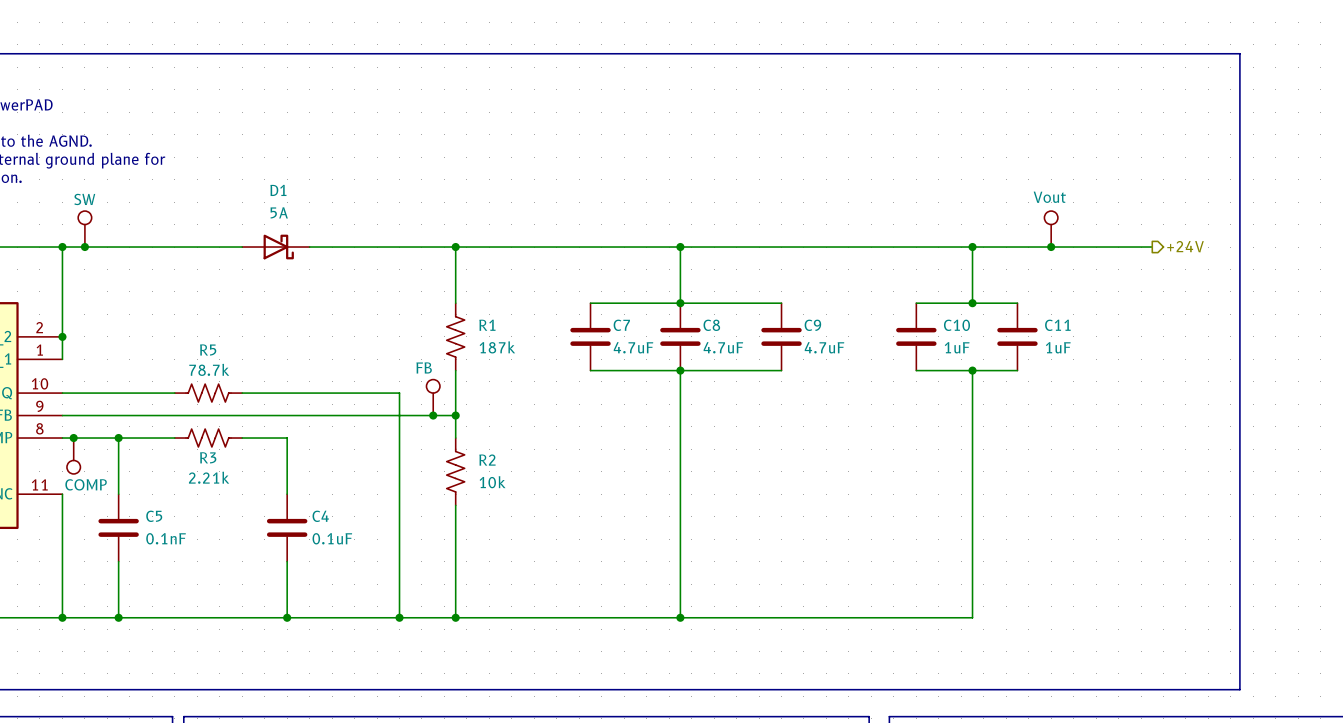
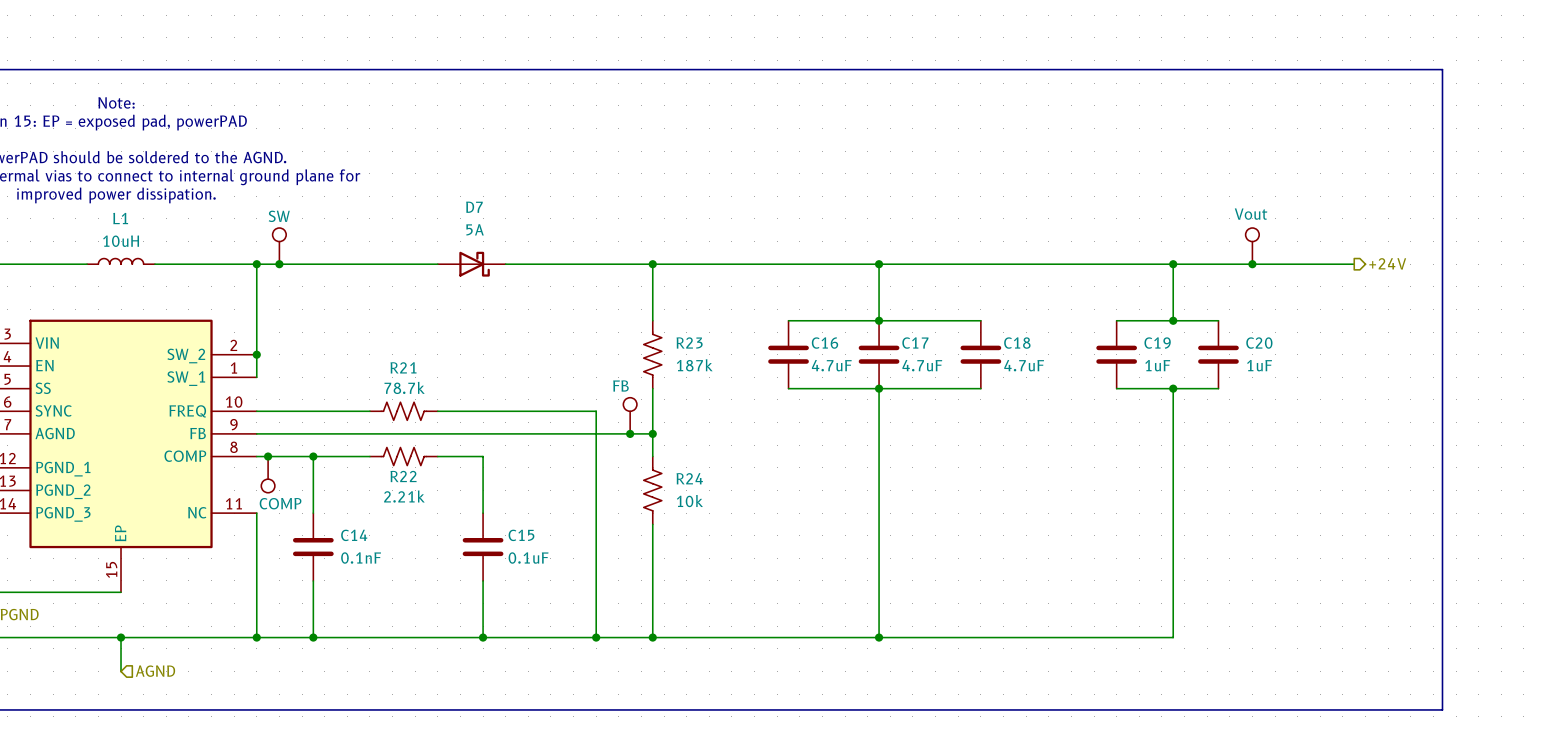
D1 name: D1 (278, 190) -> D7 (474, 207)
R1 name: R1 (487, 325) -> R23 (689, 342)
C7 name: C7 (621, 325) -> C16 (824, 343)
C8 name: C8 (711, 325) -> C17 (915, 343)
C9 name: C9 (812, 325) -> C18 (1017, 343)
C10 name: C10 (956, 325) -> C19 (1157, 343)
C11 name: C11 (1057, 325) -> C20 (1259, 343)
R5 name: R5 (208, 349) -> R21 (403, 367)
R3 name: R3 (208, 457) -> R22 (403, 476)
R2 name: R2 (487, 460) -> R24 (689, 478)
C5 name: C5 (154, 516) -> C14 (354, 535)
C4 name: C4 (320, 516) -> C15 (521, 535)

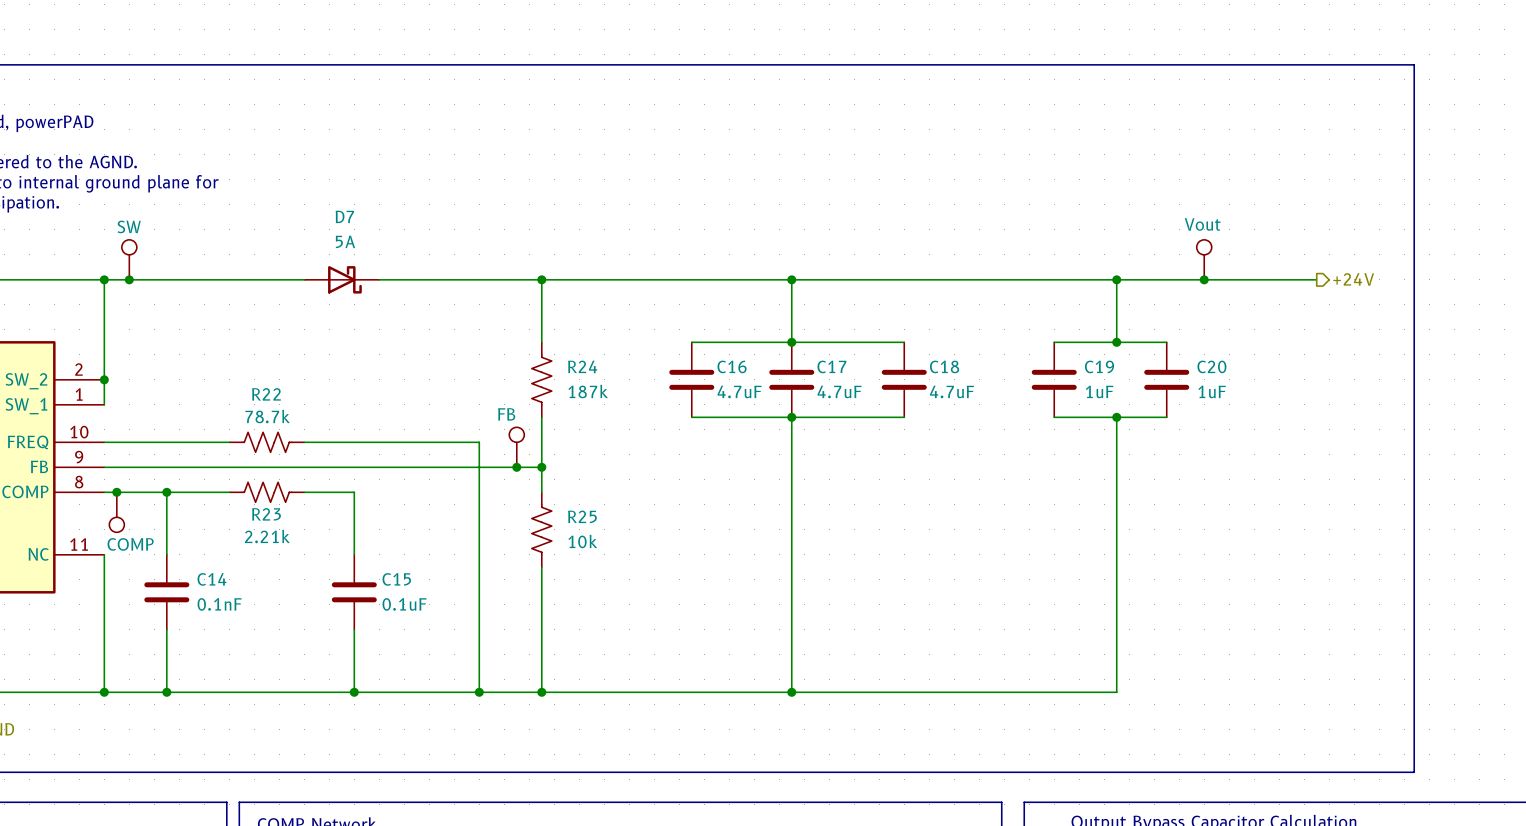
R23 name: R23 (689, 342) -> R24 (582, 366)
R21 name: R21 (403, 367) -> R22 (266, 394)
R22 name: R22 (403, 476) -> R23 (266, 514)
R24 name: R24 (689, 478) -> R25 (582, 516)

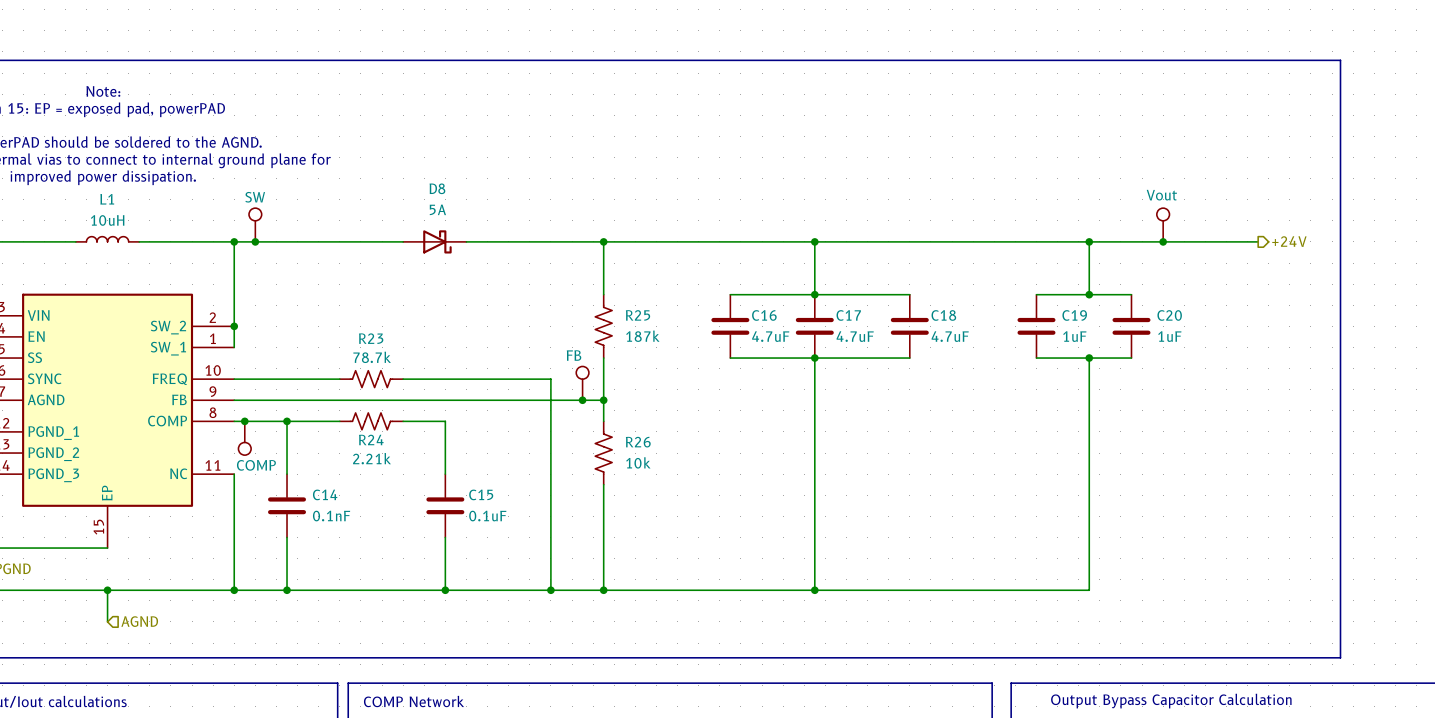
D7 name: D7 (344, 216) -> D8 (437, 188)
R24 name: R24 (582, 366) -> R25 (638, 315)
R22 name: R22 (266, 394) -> R23 (371, 338)
R23 name: R23 (266, 514) -> R24 (371, 439)
R25 name: R25 (582, 516) -> R26 (638, 442)

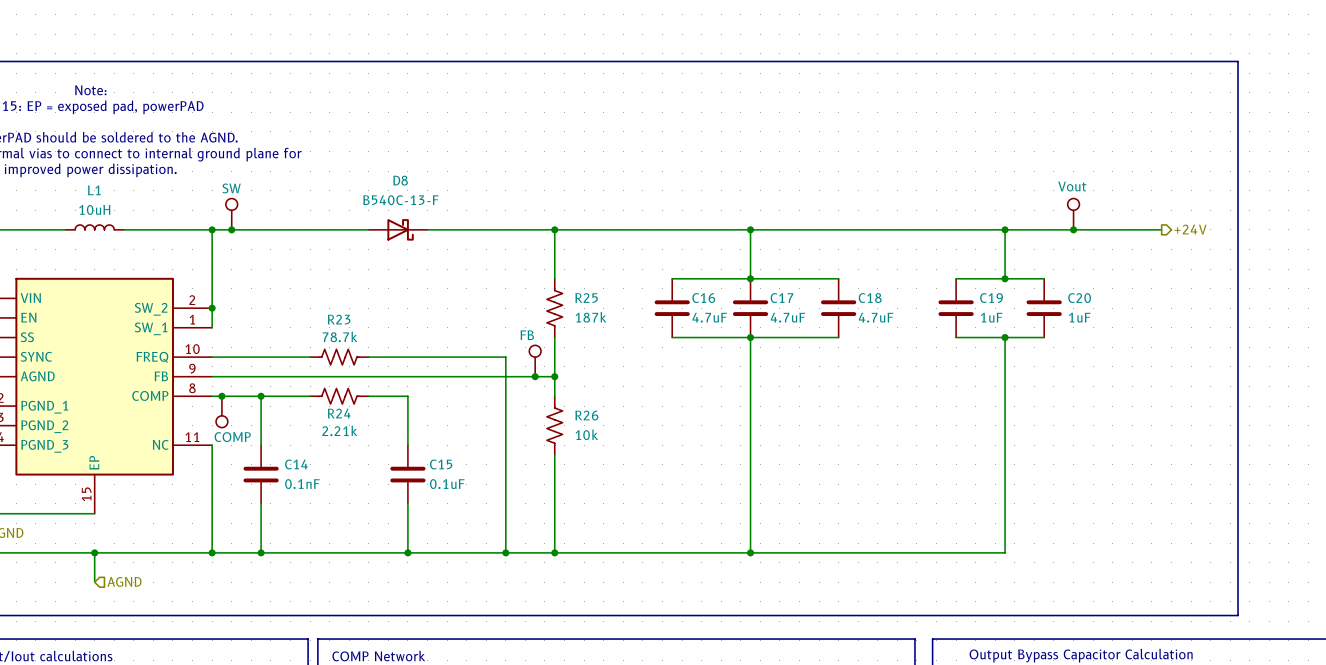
D8 value: 5A (437, 209) -> B540C-13-F (400, 200)

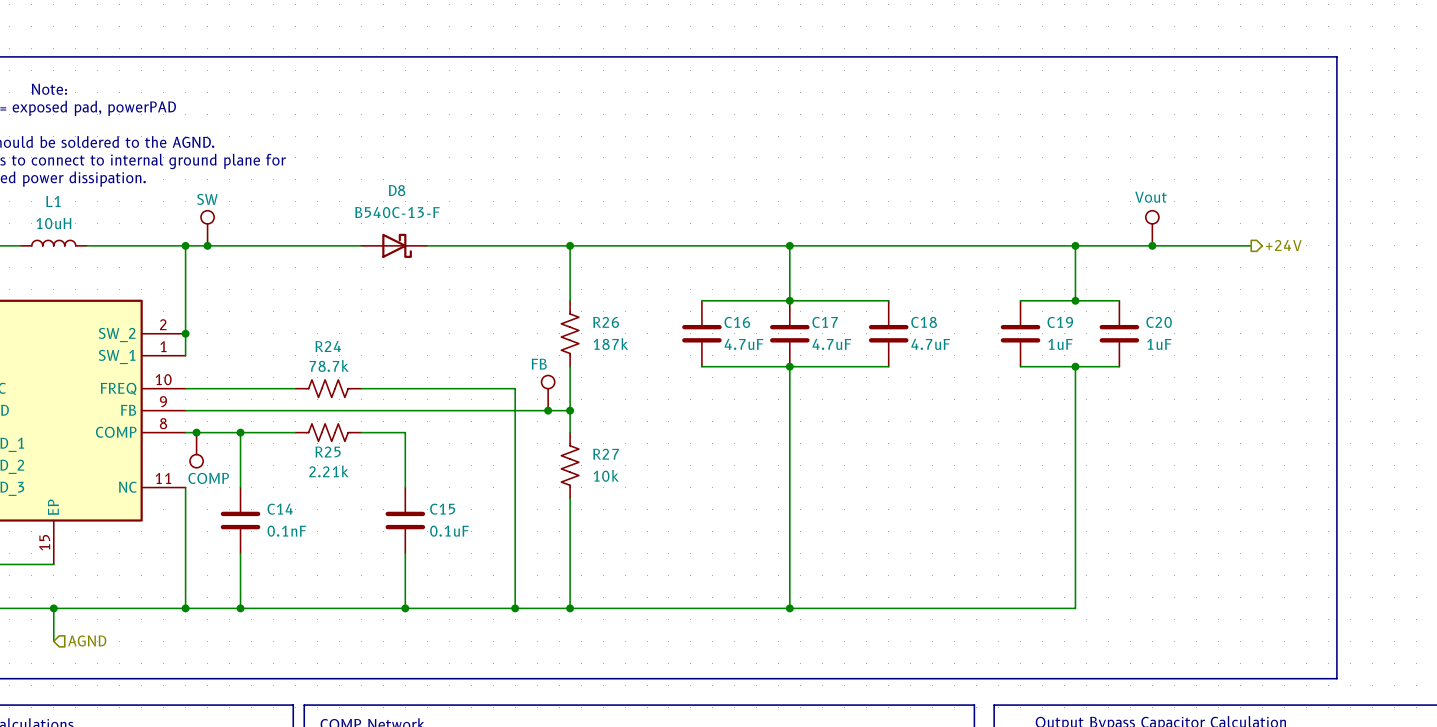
R25 name: R25 (586, 298) -> R26 (606, 322)
R23 name: R23 (339, 319) -> R24 (328, 346)
R24 name: R24 (339, 413) -> R25 (328, 452)
R26 name: R26 (586, 415) -> R27 (606, 454)

